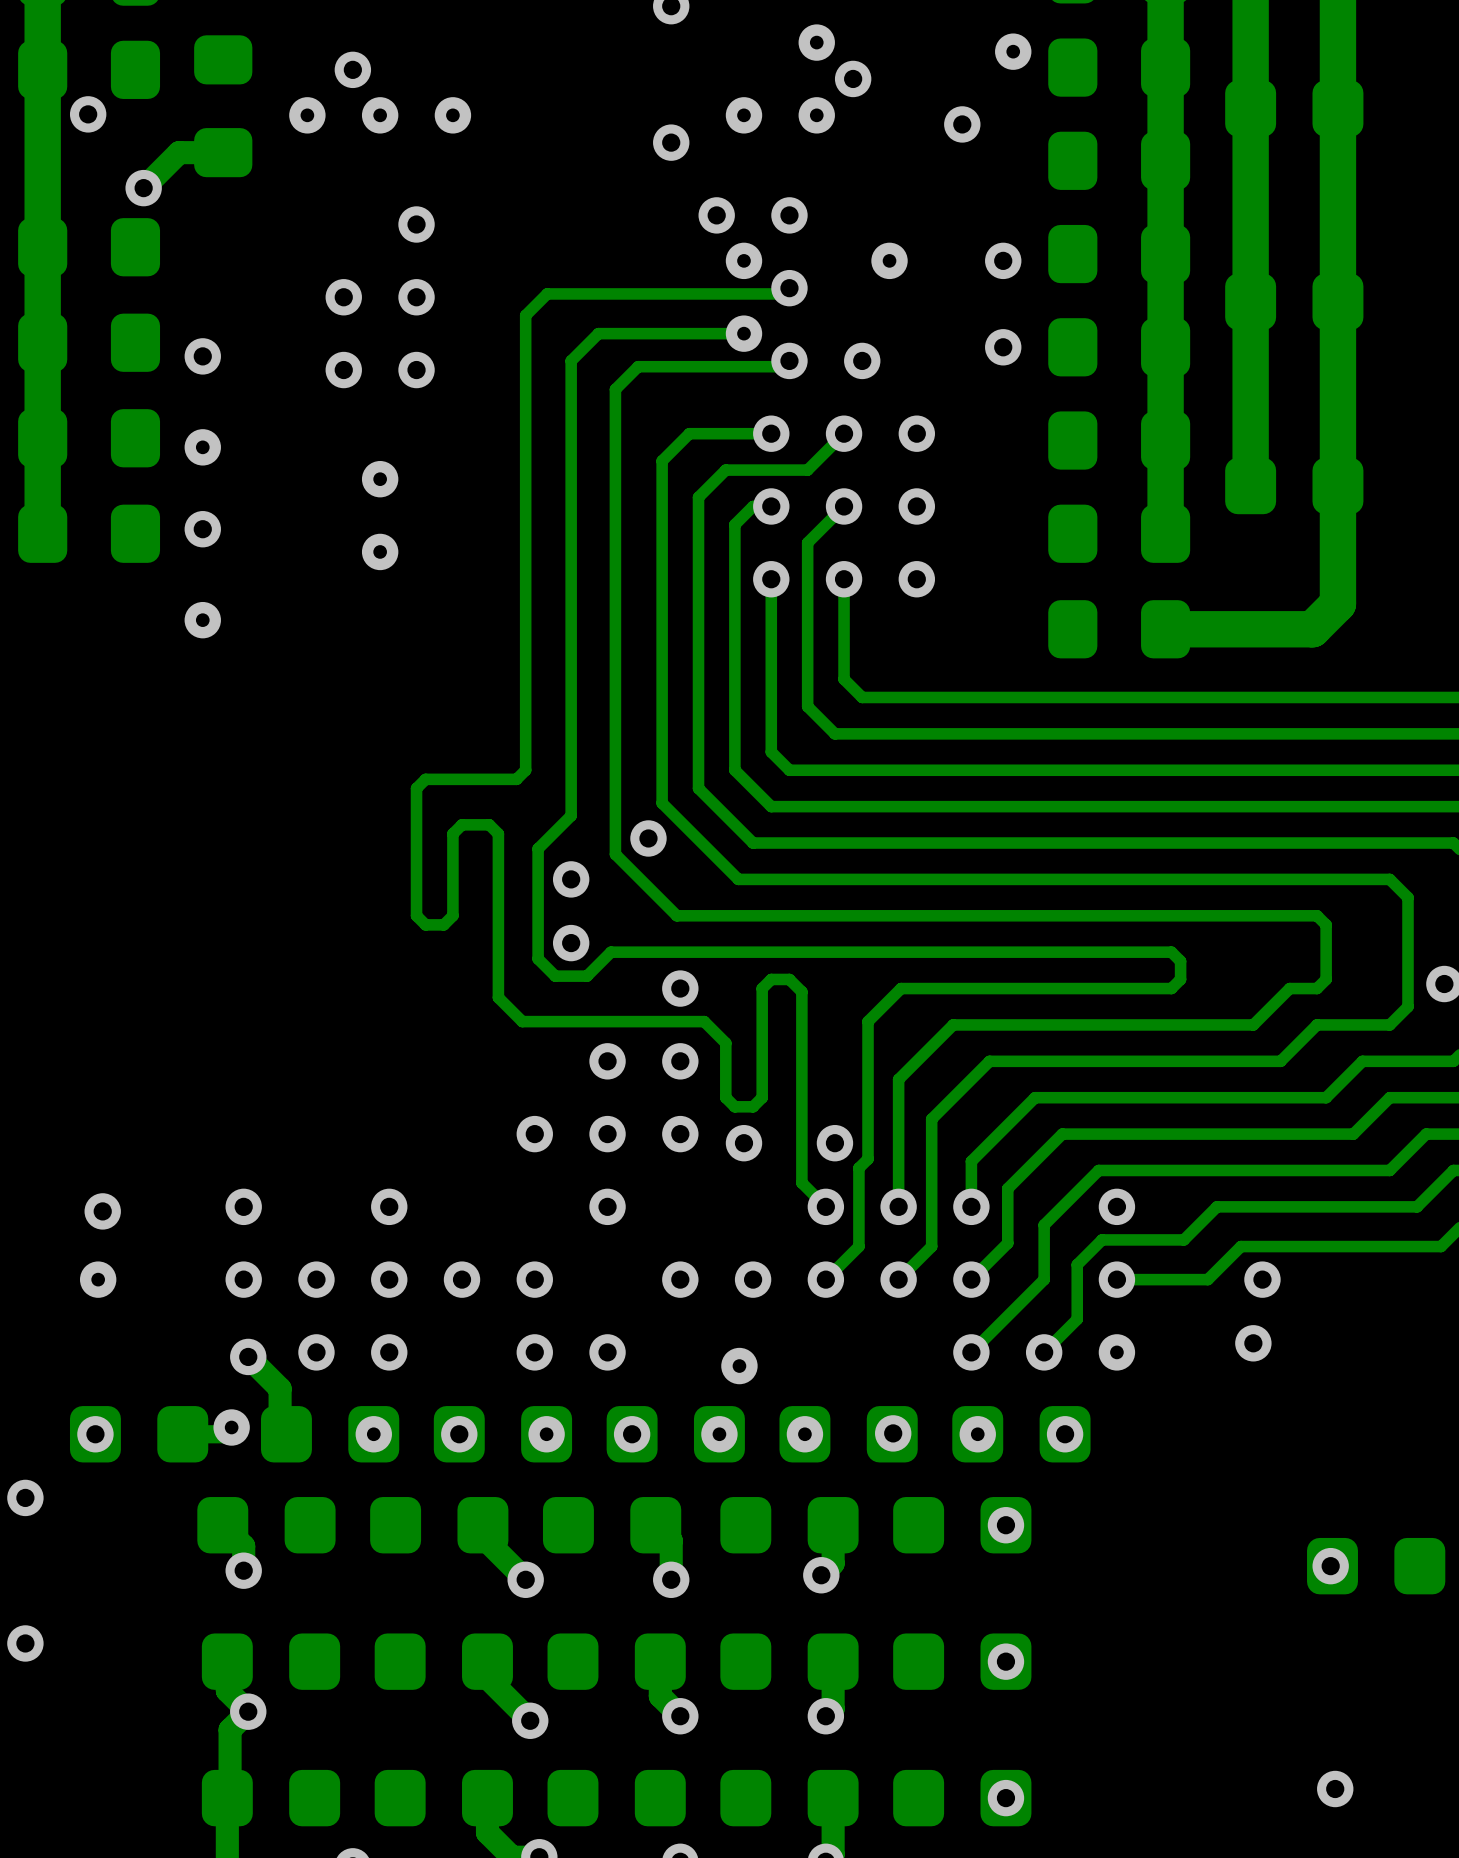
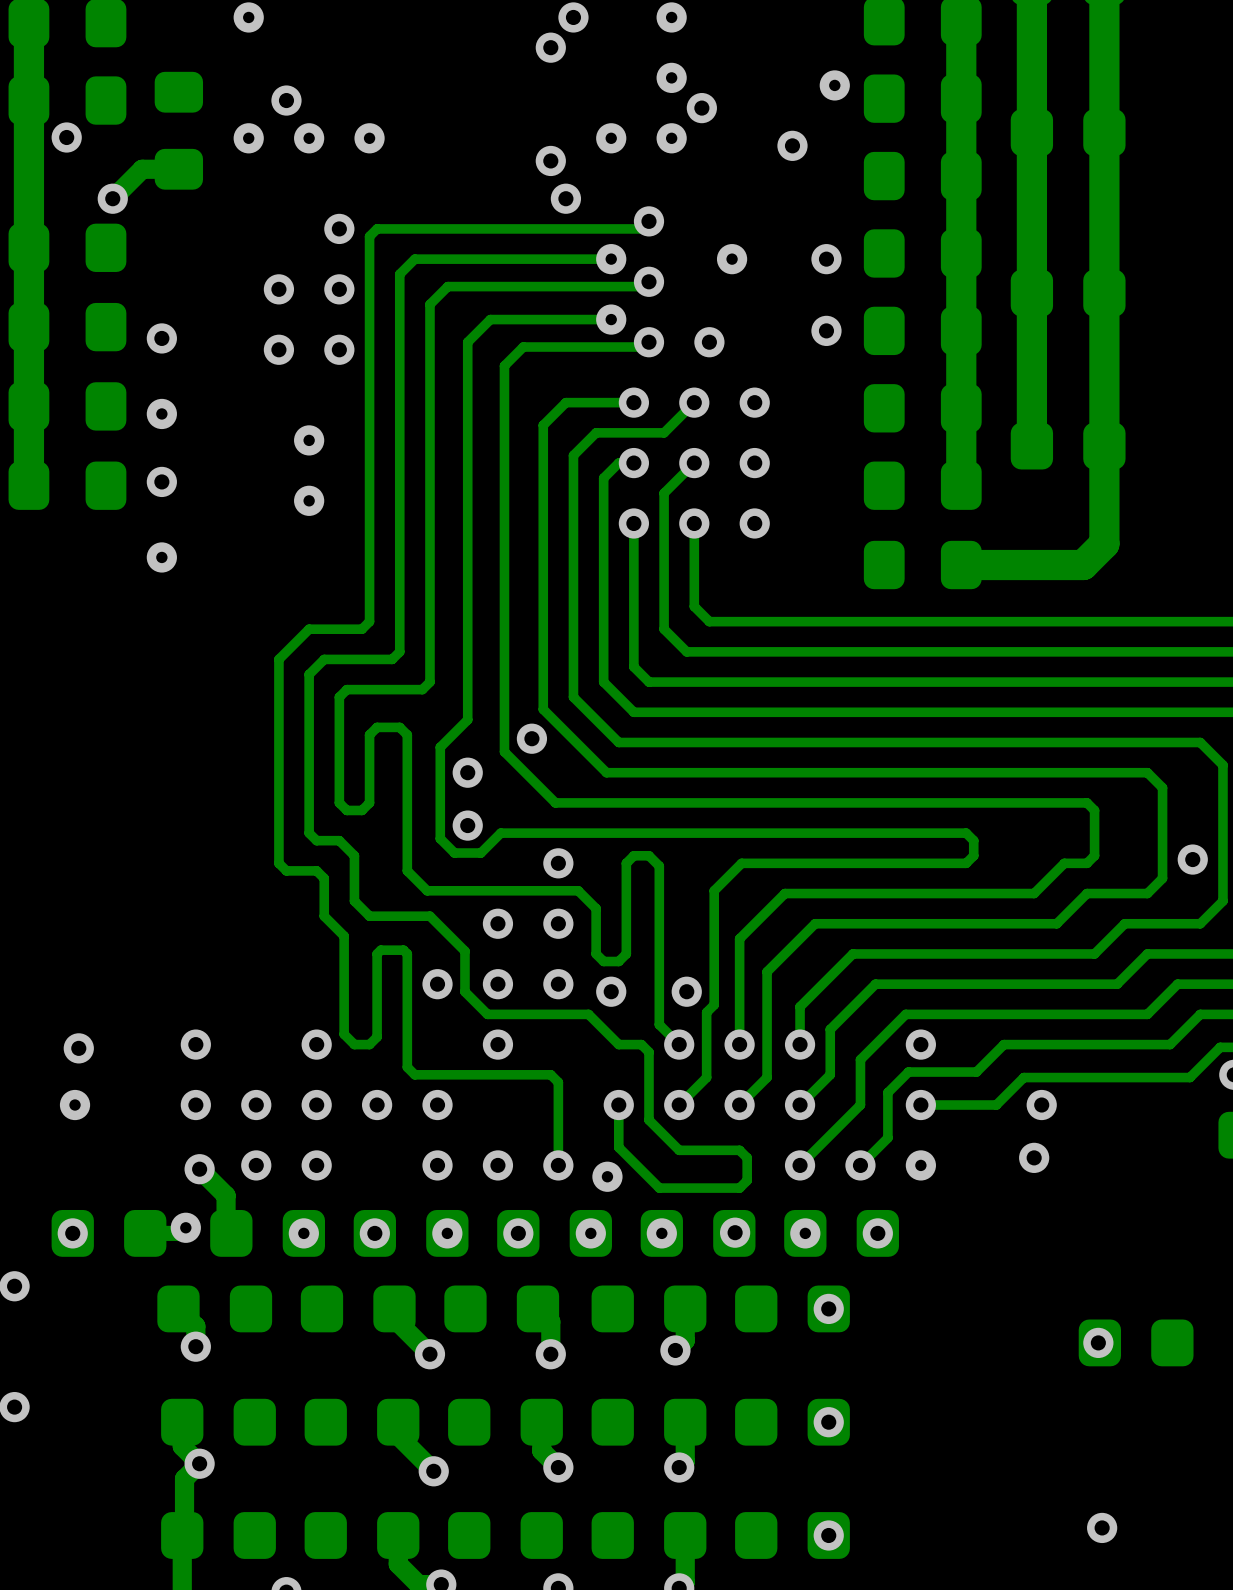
via position: (716, 215) -> (565, 198)
track: none -> (648, 221) (641, 228) (377, 228) (369, 236) (369, 621) (362, 629) (309, 629) (278, 659) (278, 863) (286, 870) (316, 870) (324, 878) (324, 916) (344, 936) (344, 1034) (354, 1044) (369, 1044) (377, 1037) (377, 953) (380, 950) (403, 950) (407, 953) (407, 1067) (414, 1074) (550, 1074) (558, 1082) (558, 1165)
track: none -> (611, 259) (414, 259) (399, 274) (399, 651) (392, 659) (324, 659) (309, 674) (309, 833) (316, 840) (339, 840) (354, 855) (354, 901) (369, 916) (429, 916) (464, 951) (464, 991) (487, 1014) (588, 1014) (618, 1044) (641, 1044) (648, 1052) (648, 1120) (679, 1150) (739, 1150) (747, 1157) (747, 1180) (739, 1188) (659, 1188) (618, 1147) (618, 1105)
via position: (680, 1279) -> (558, 1165)

